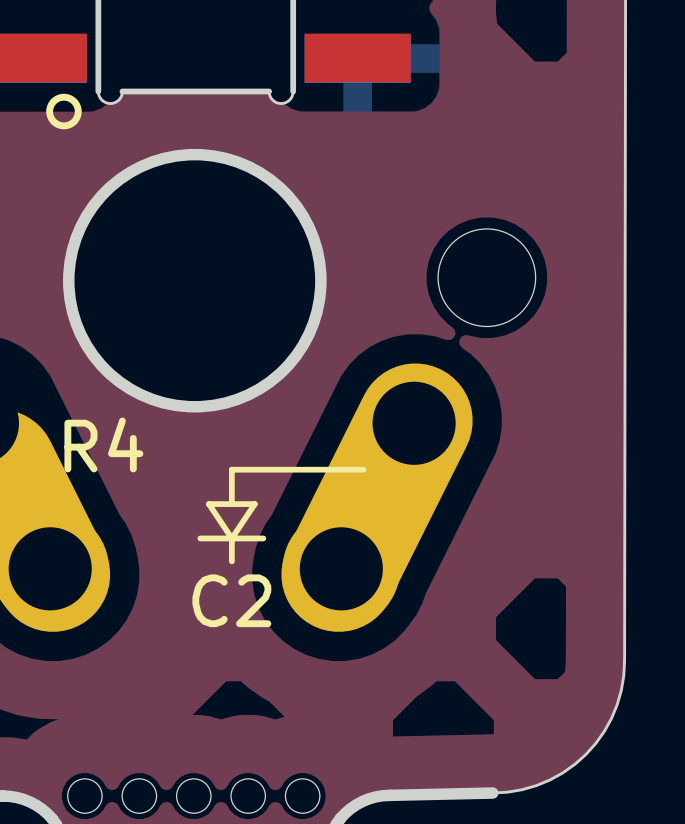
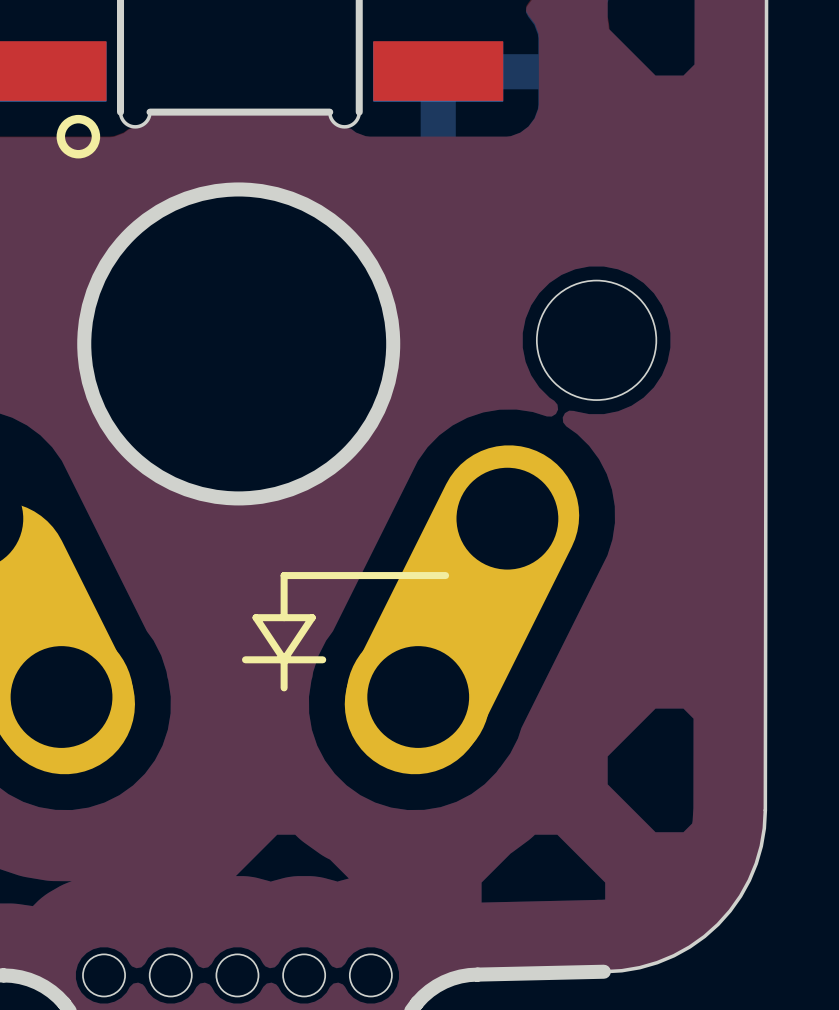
text: R4 (103, 444) -> none
text: C2 (231, 600) -> none

